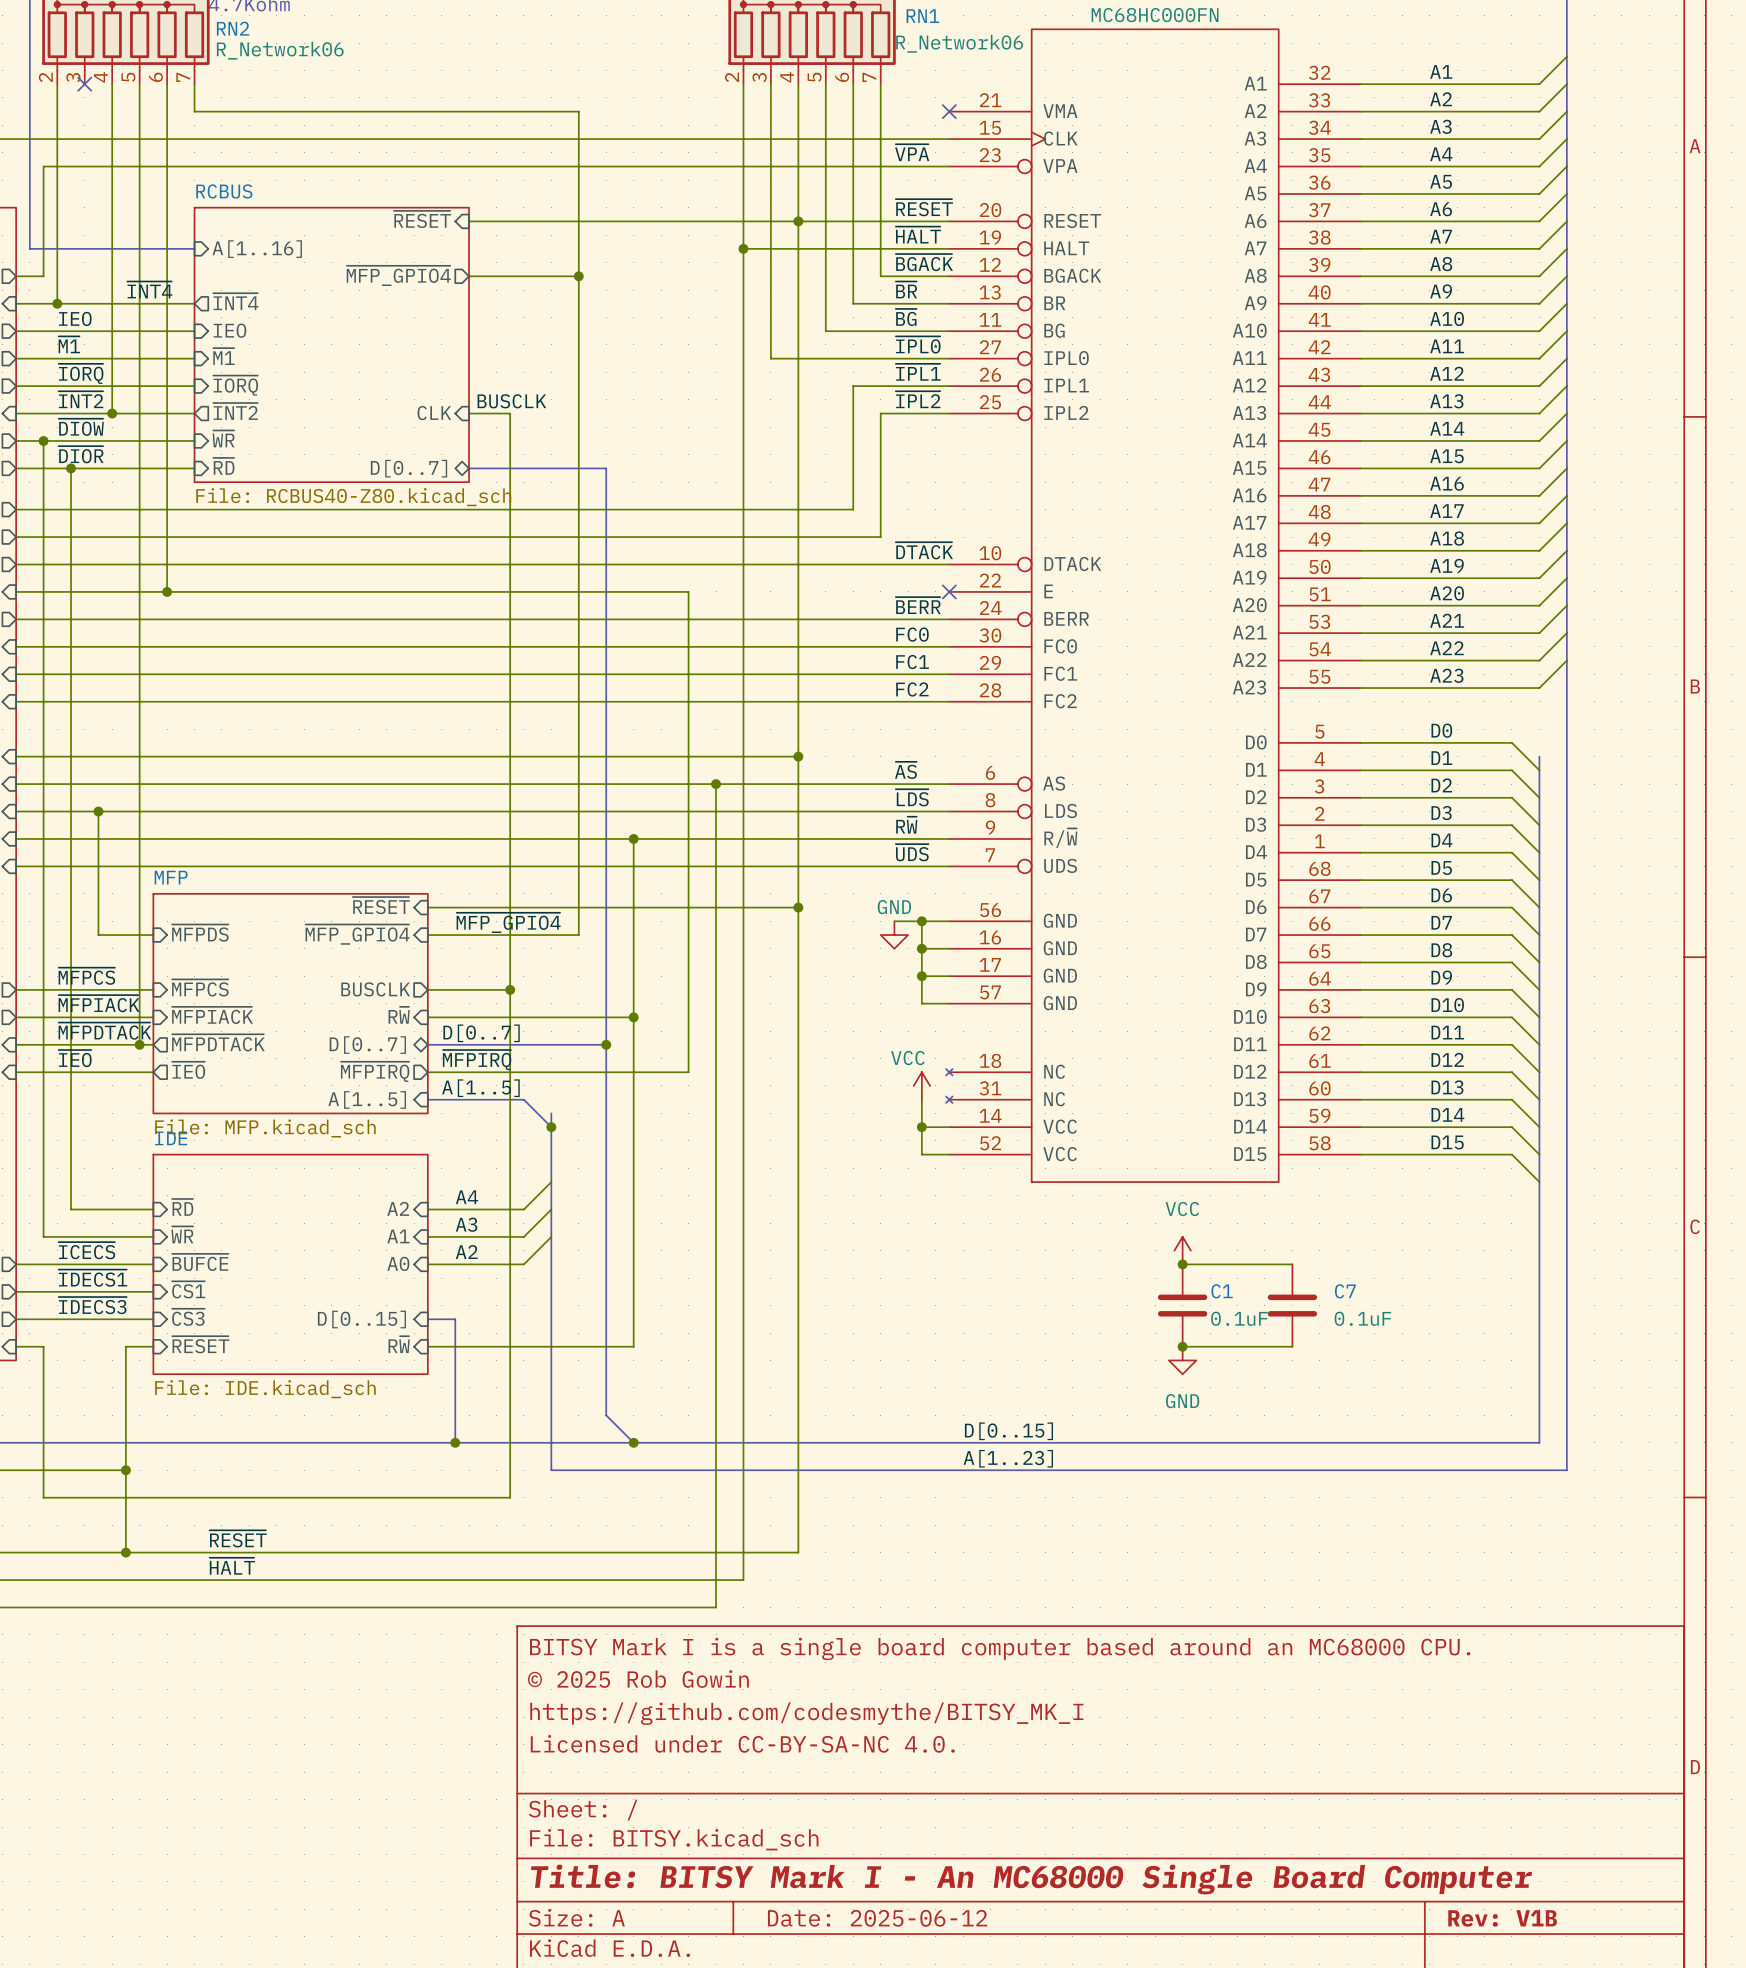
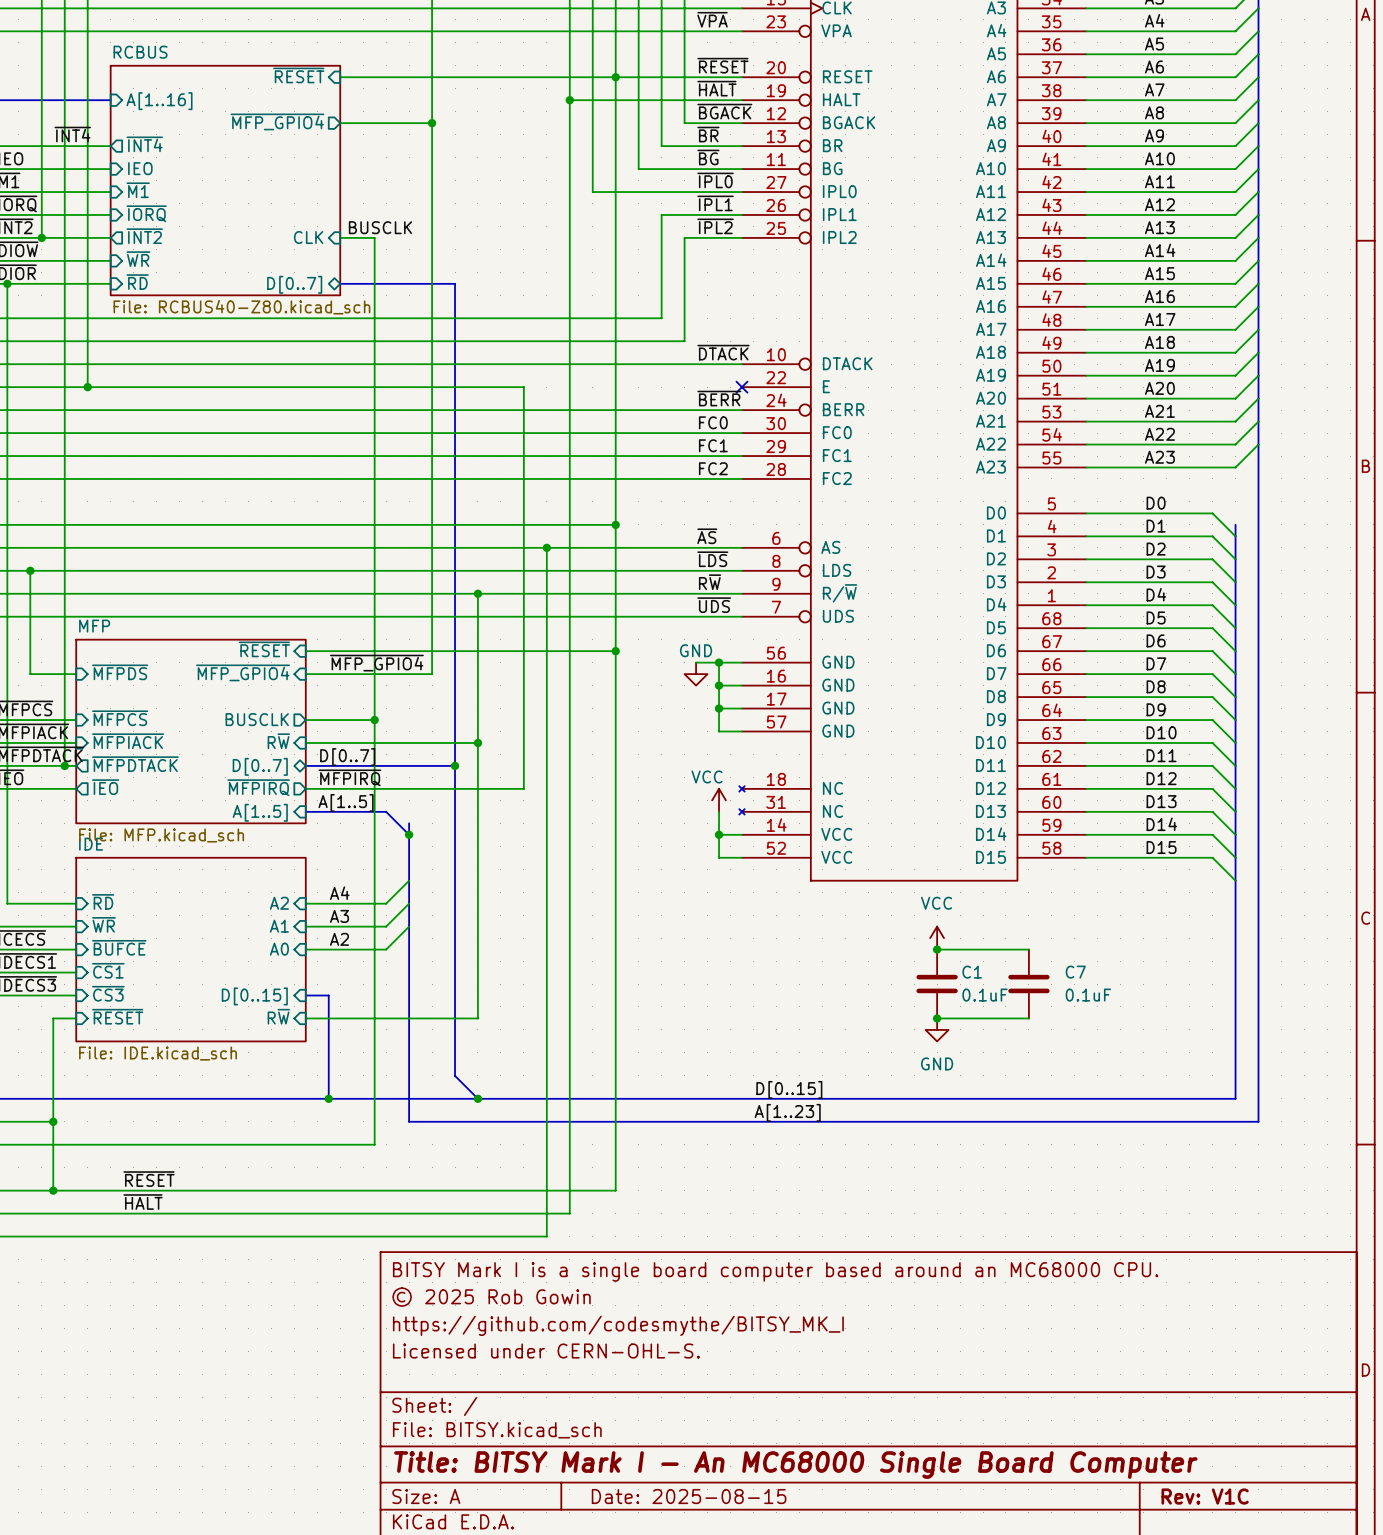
title block: Licensed under CC-BY-SA-NC 4.0. (742, 1743) -> Licensed under CERN-OHL-S. (546, 1351)
title block: Date: 2025-06-12 (877, 1918) -> Date: 2025-08-15 (689, 1496)
title block: Rev: V1B (1502, 1918) -> Rev: V1C (1205, 1496)

